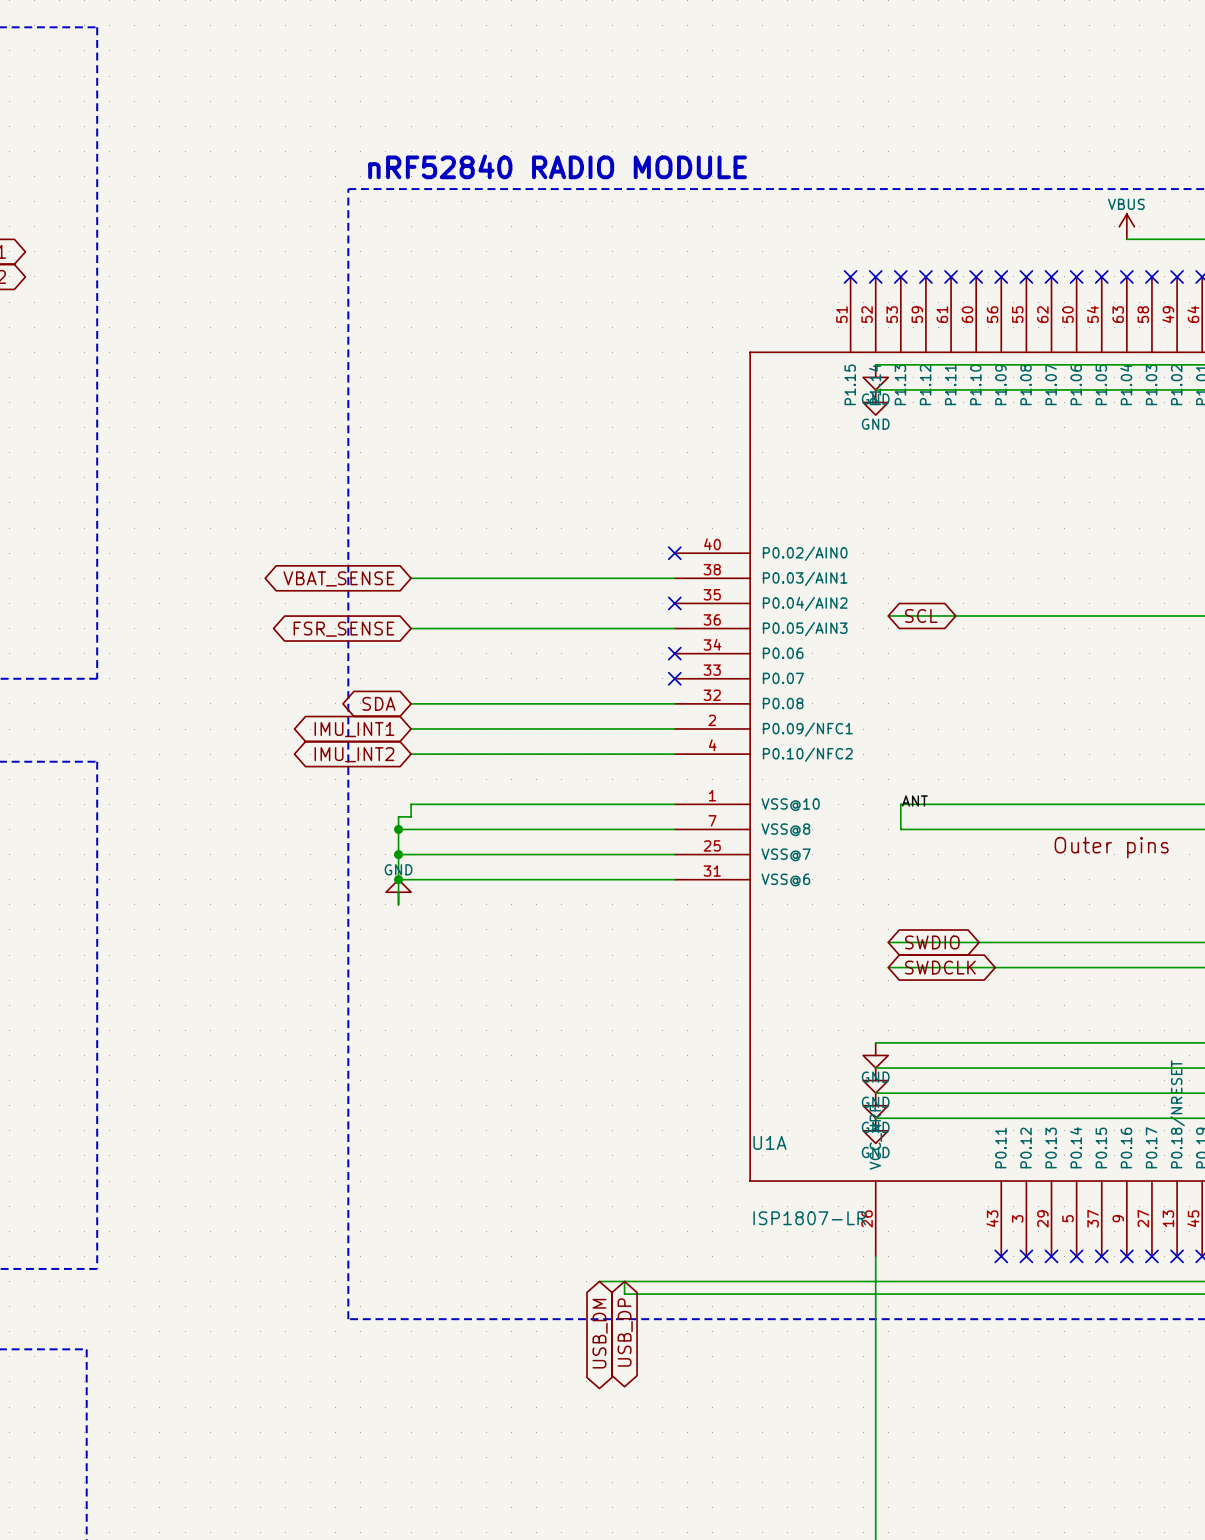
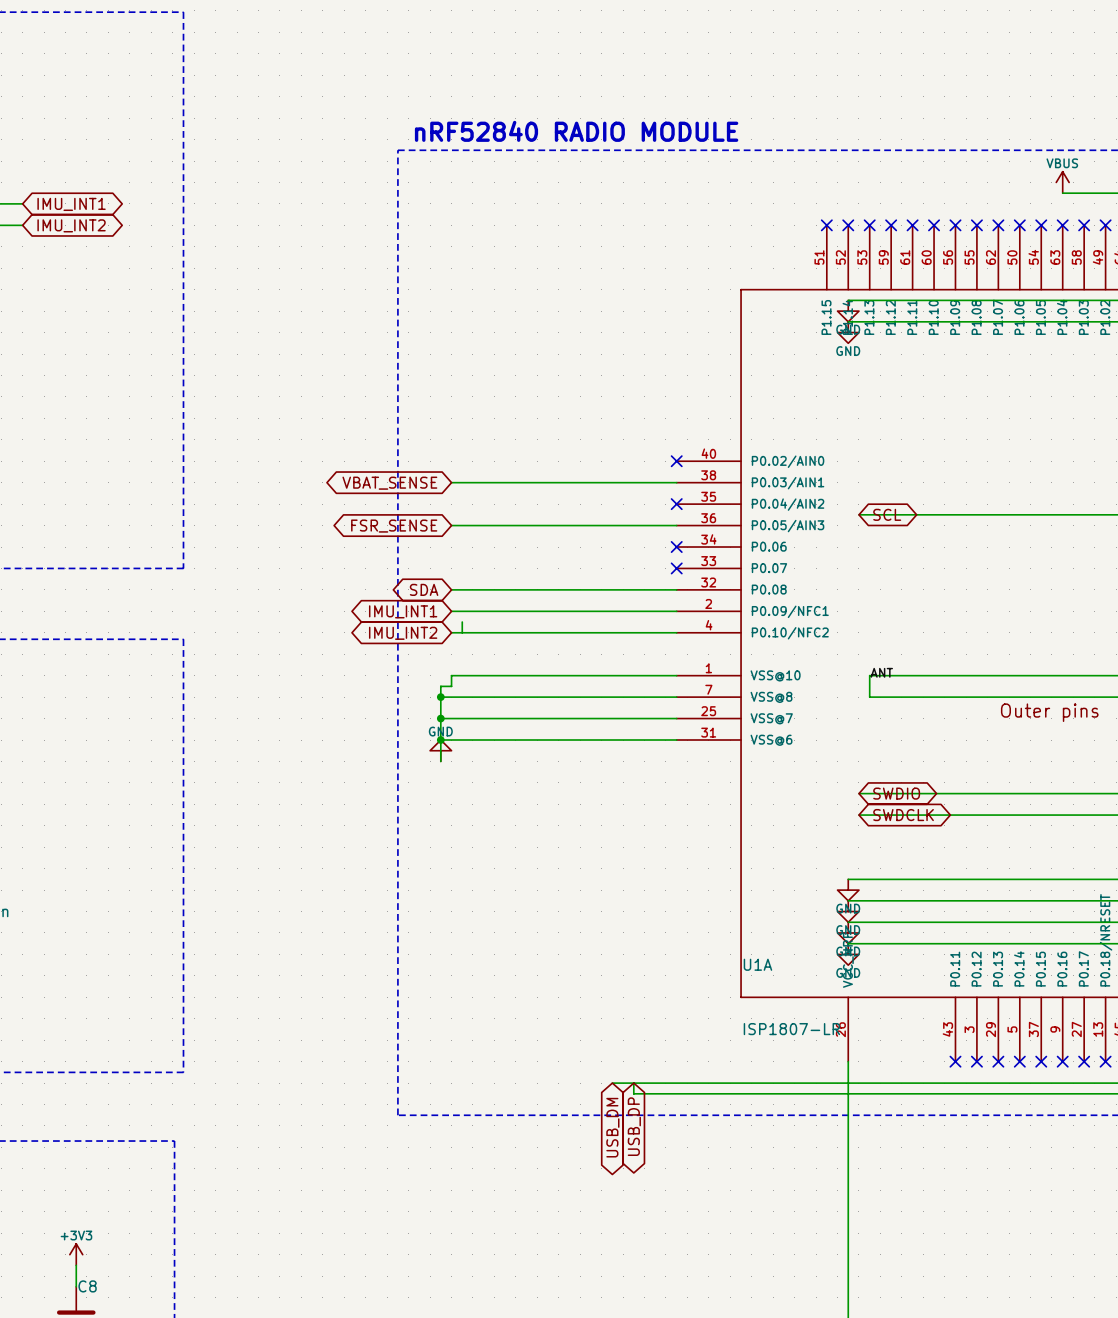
wire: none -> (462, 622) (462, 632)

